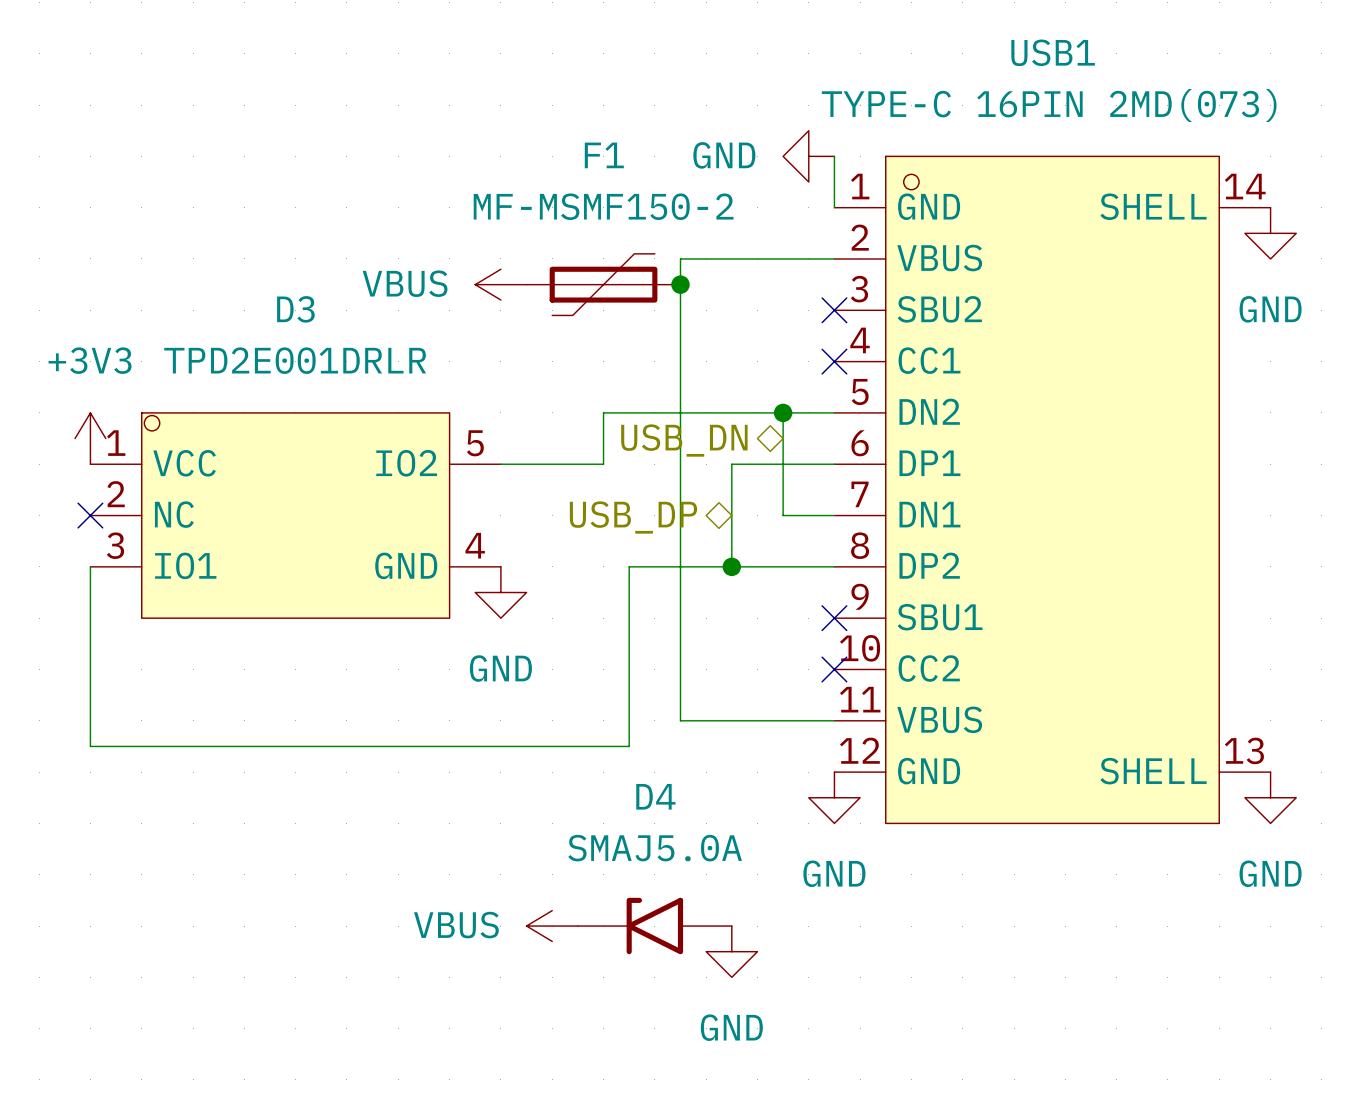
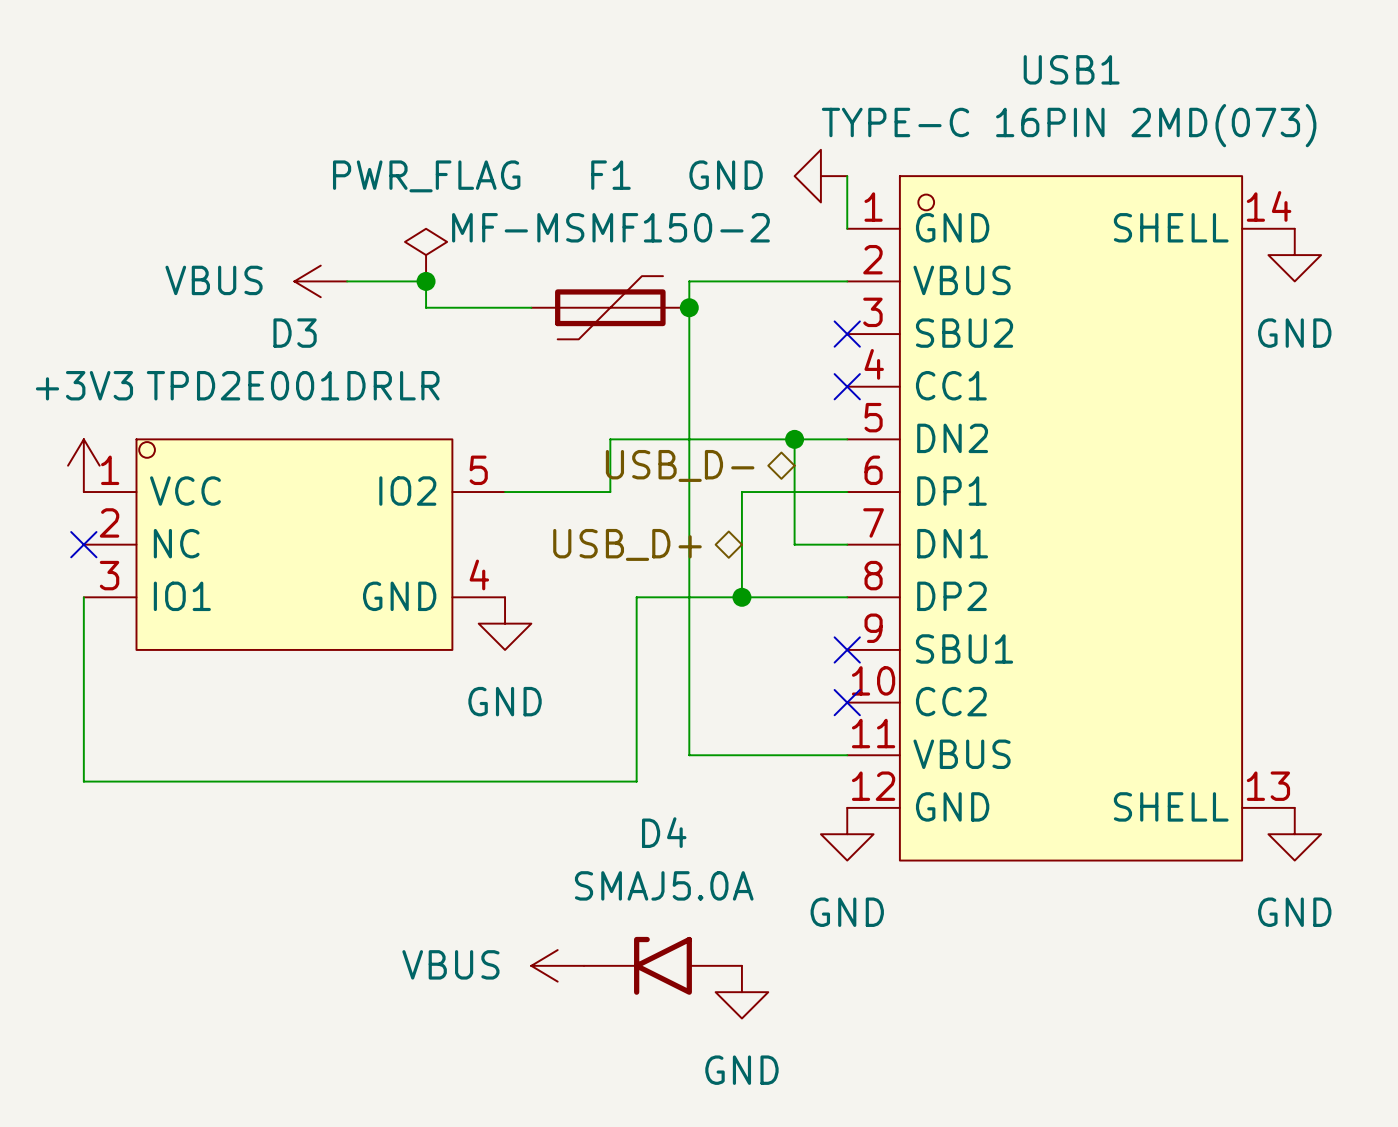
power symbol: none -> PWR_FLAG (426, 255)
wire: none -> (347, 281) (426, 281) (426, 307) (531, 307)
junction: none -> (426, 281)
power symbol position: VBUS (500, 284) -> VBUS (320, 281)
hierarchical label: USB_DN (684, 440) -> USB_D- (680, 465)
hierarchical label: USB_DP (633, 517) -> USB_D+ (627, 544)

